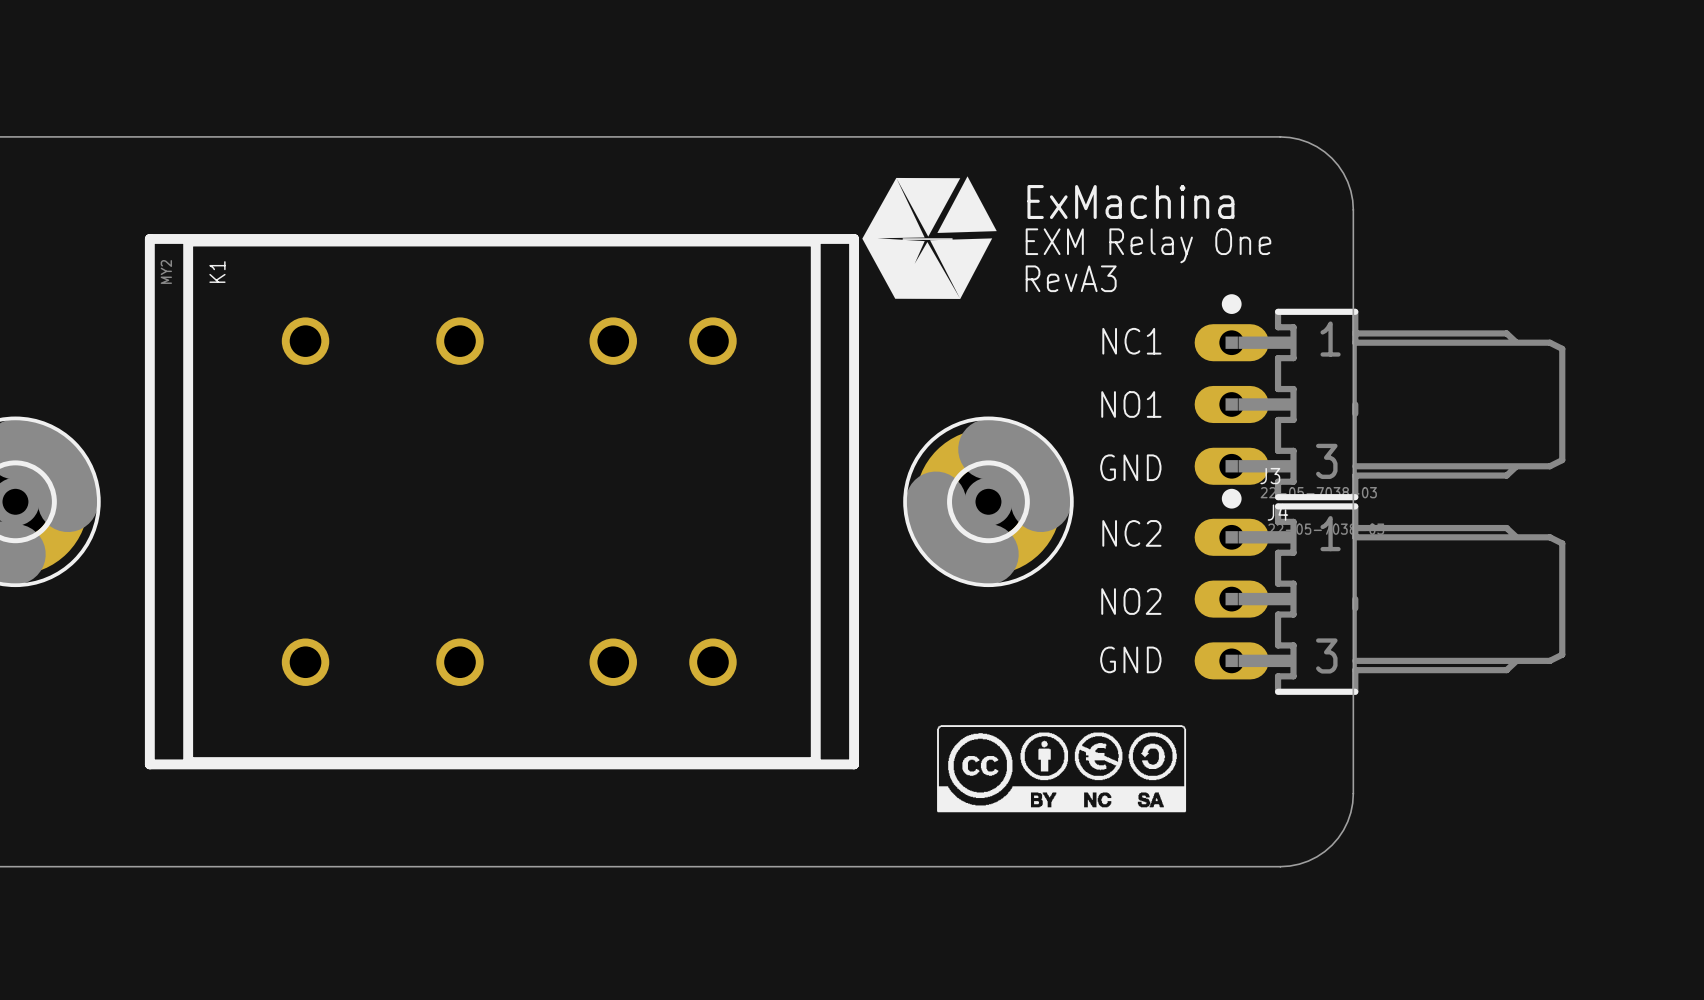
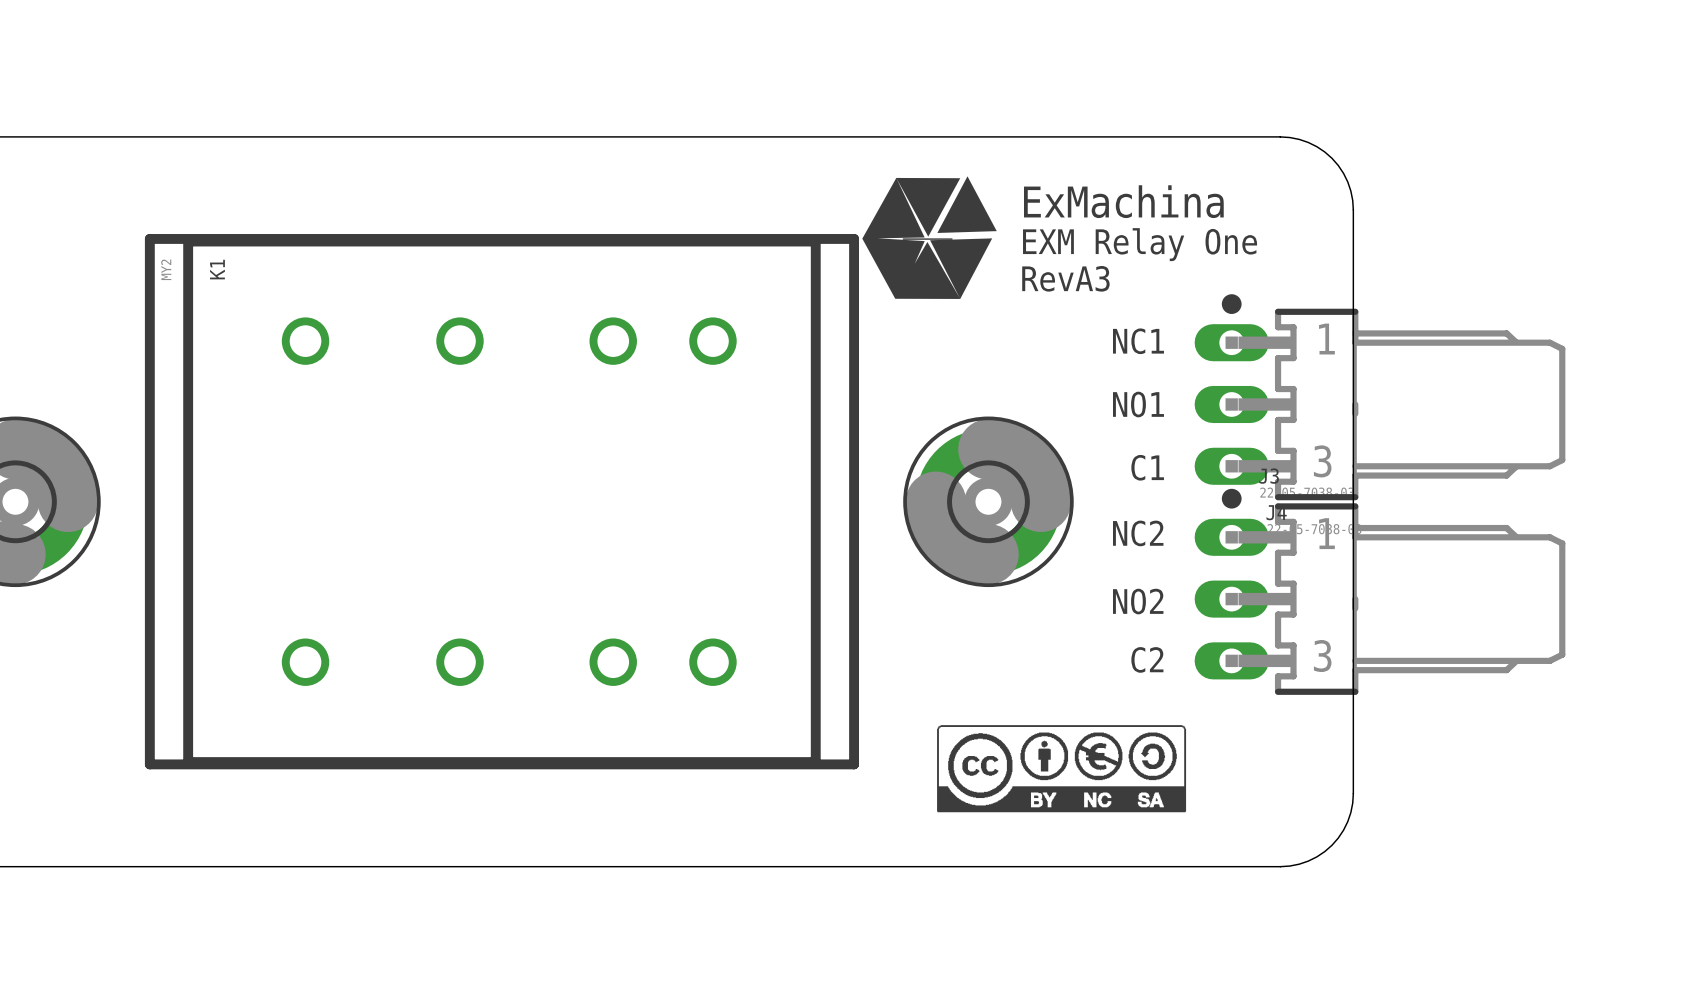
text: GND (1130, 467) -> C1 (1147, 467)
text: GND (1130, 659) -> C2 (1147, 659)

